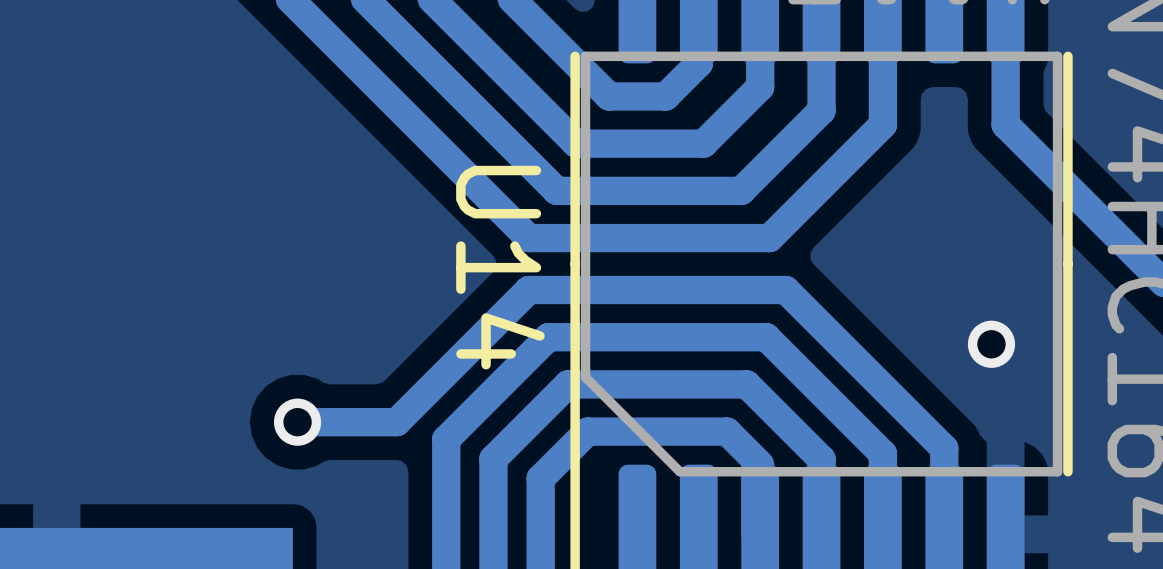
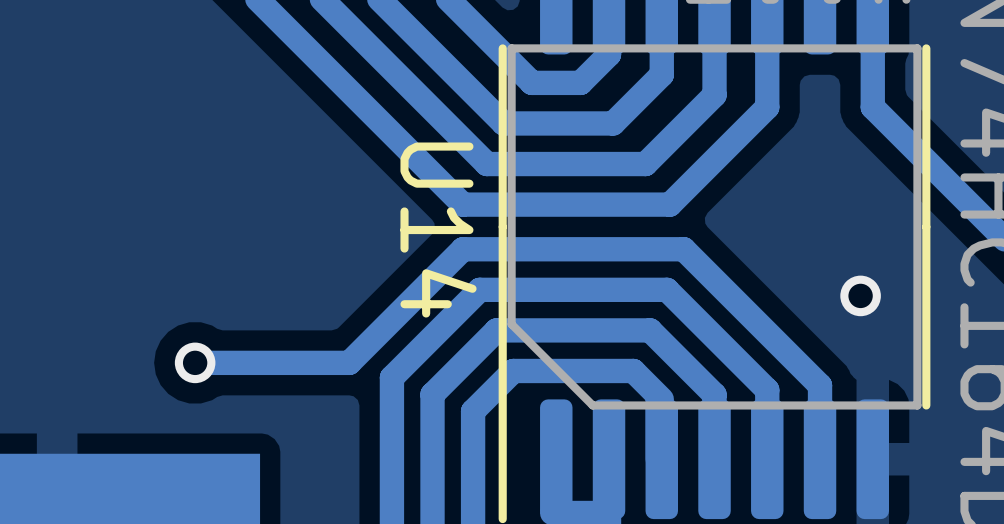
track: none -> (264, 362) (195, 362)
via position: (297, 422) -> (195, 362)

